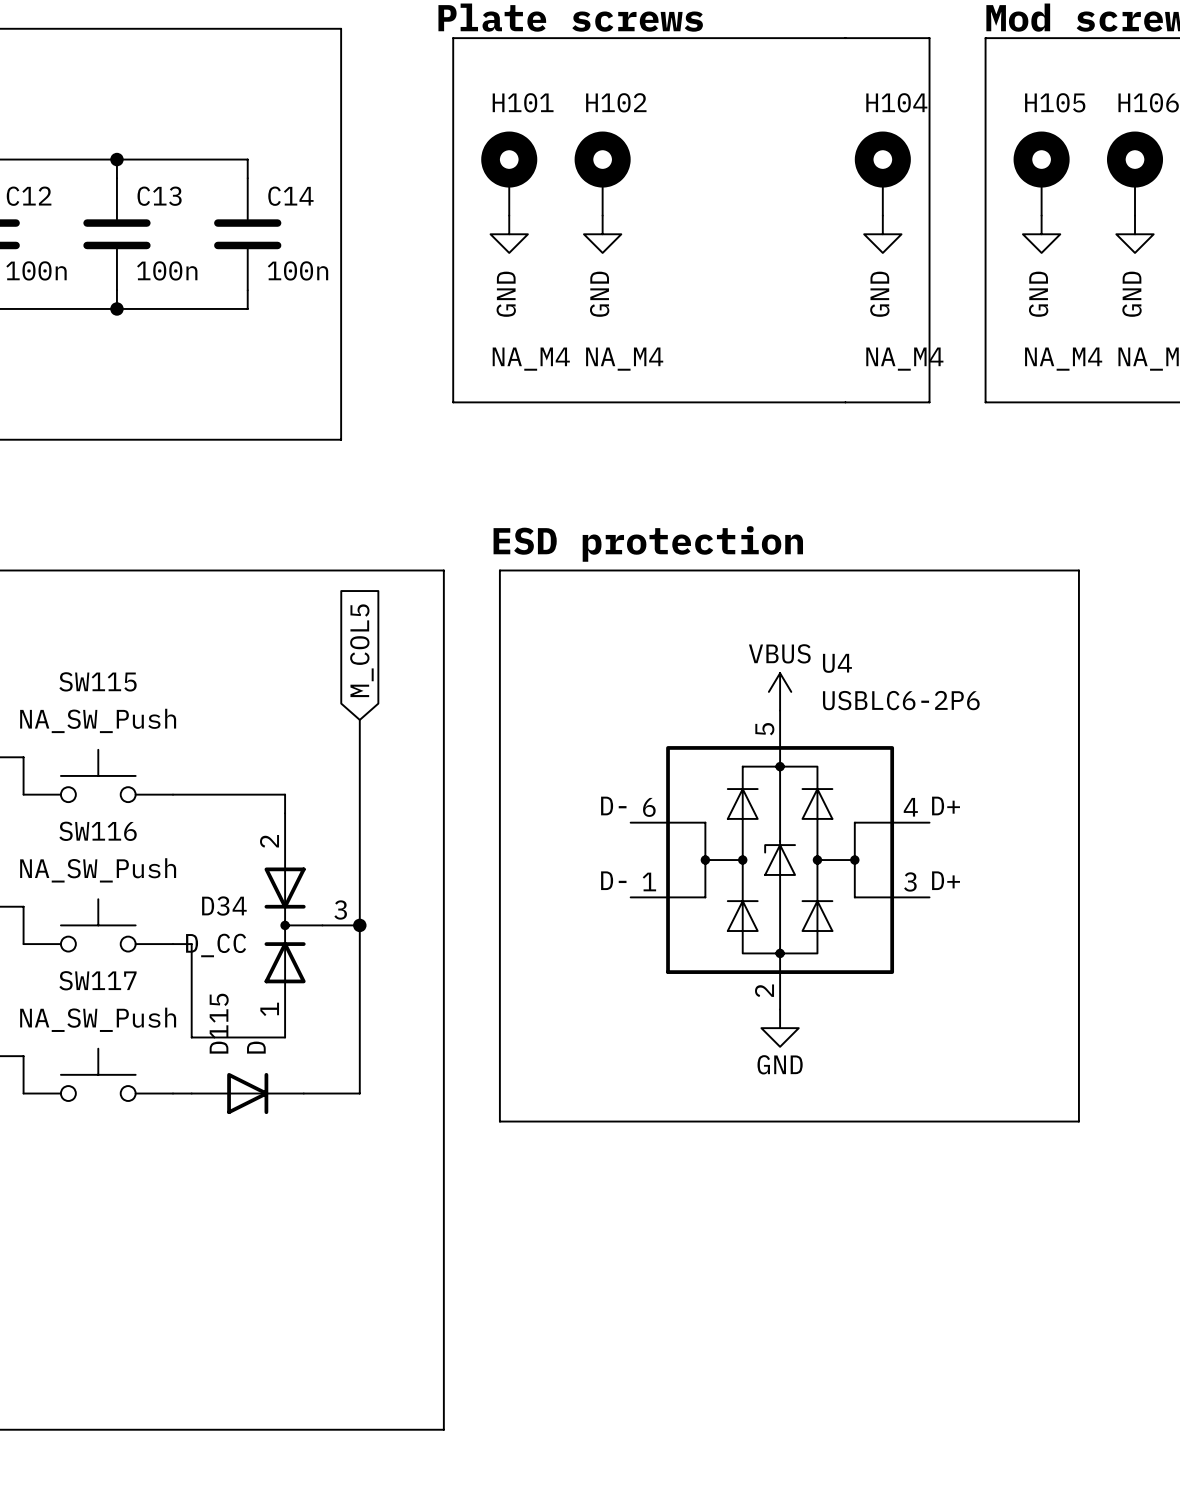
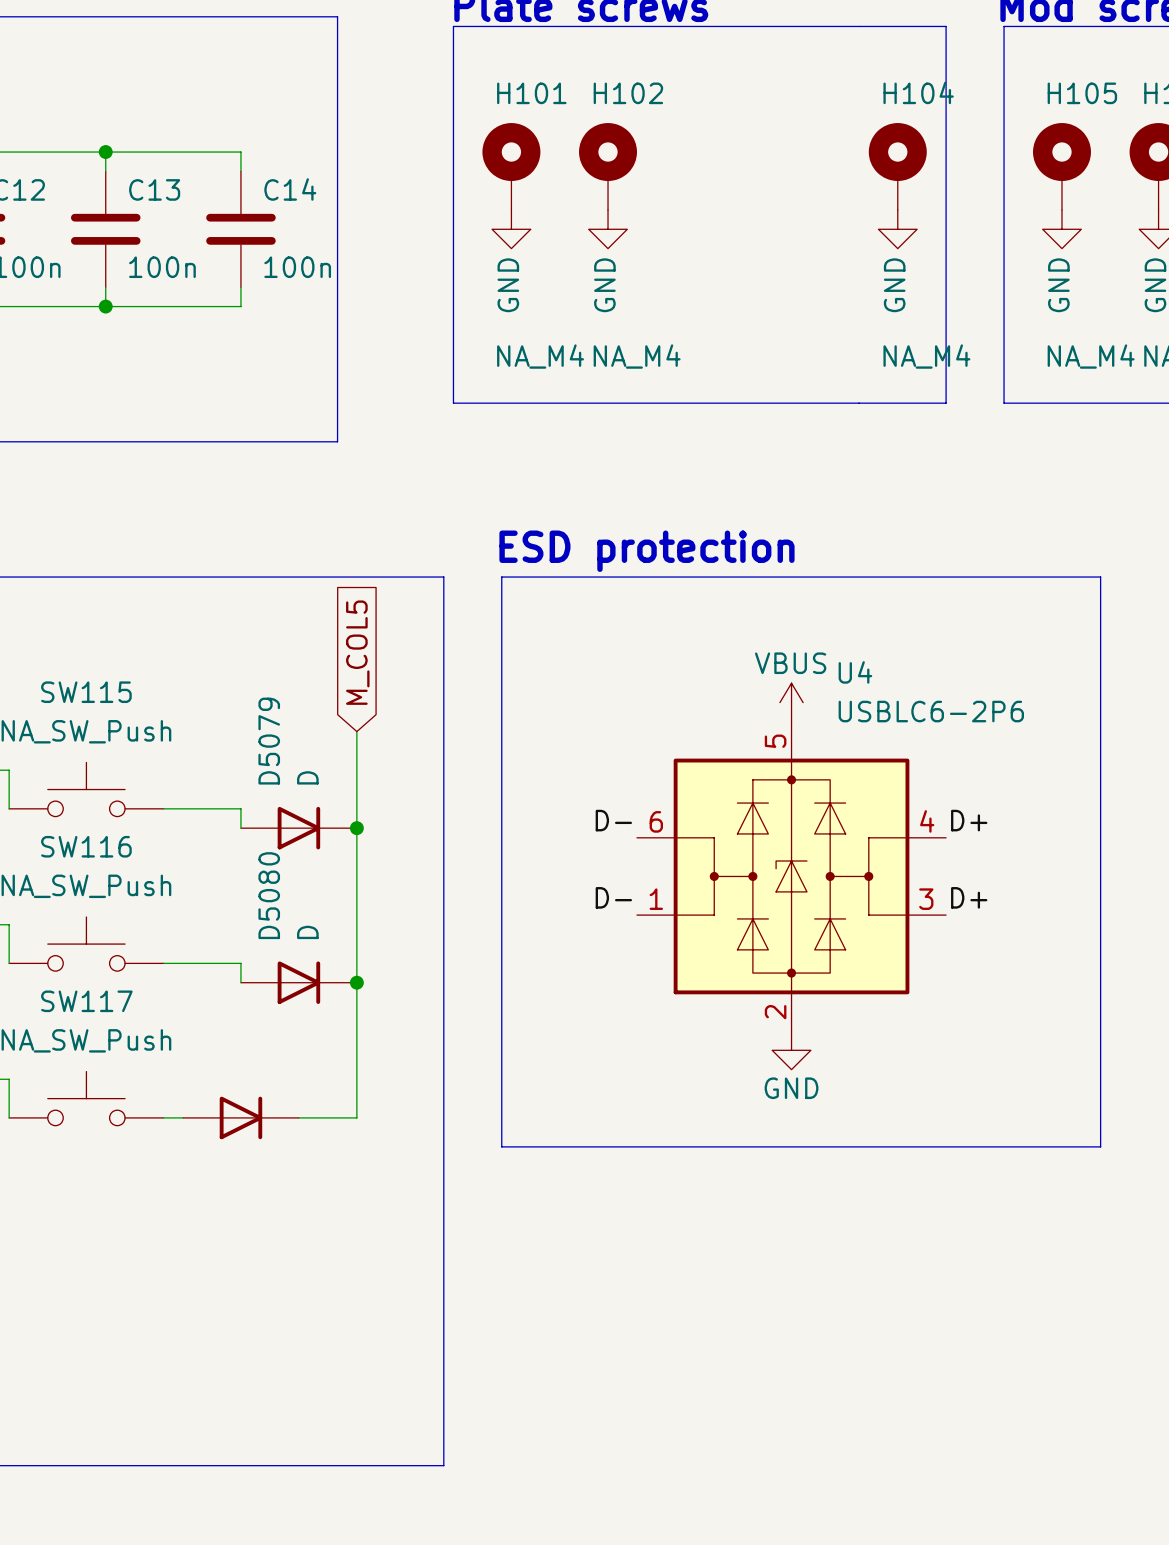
wire: (247, 794) (285, 794) (285, 813) -> (240, 808) (240, 828)
D5079: none -> D (298, 828)
junction: none -> (356, 828)
D34: D_CC (312, 925) -> none
junction position: (359, 925) -> (356, 982)
wire: (191, 944) (191, 1037) (285, 1037) -> (183, 963) (240, 963) (240, 982)
D5080: none -> D (298, 982)
D115 name: D115 (219, 1023) -> none
D115 value: D (256, 1047) -> none

